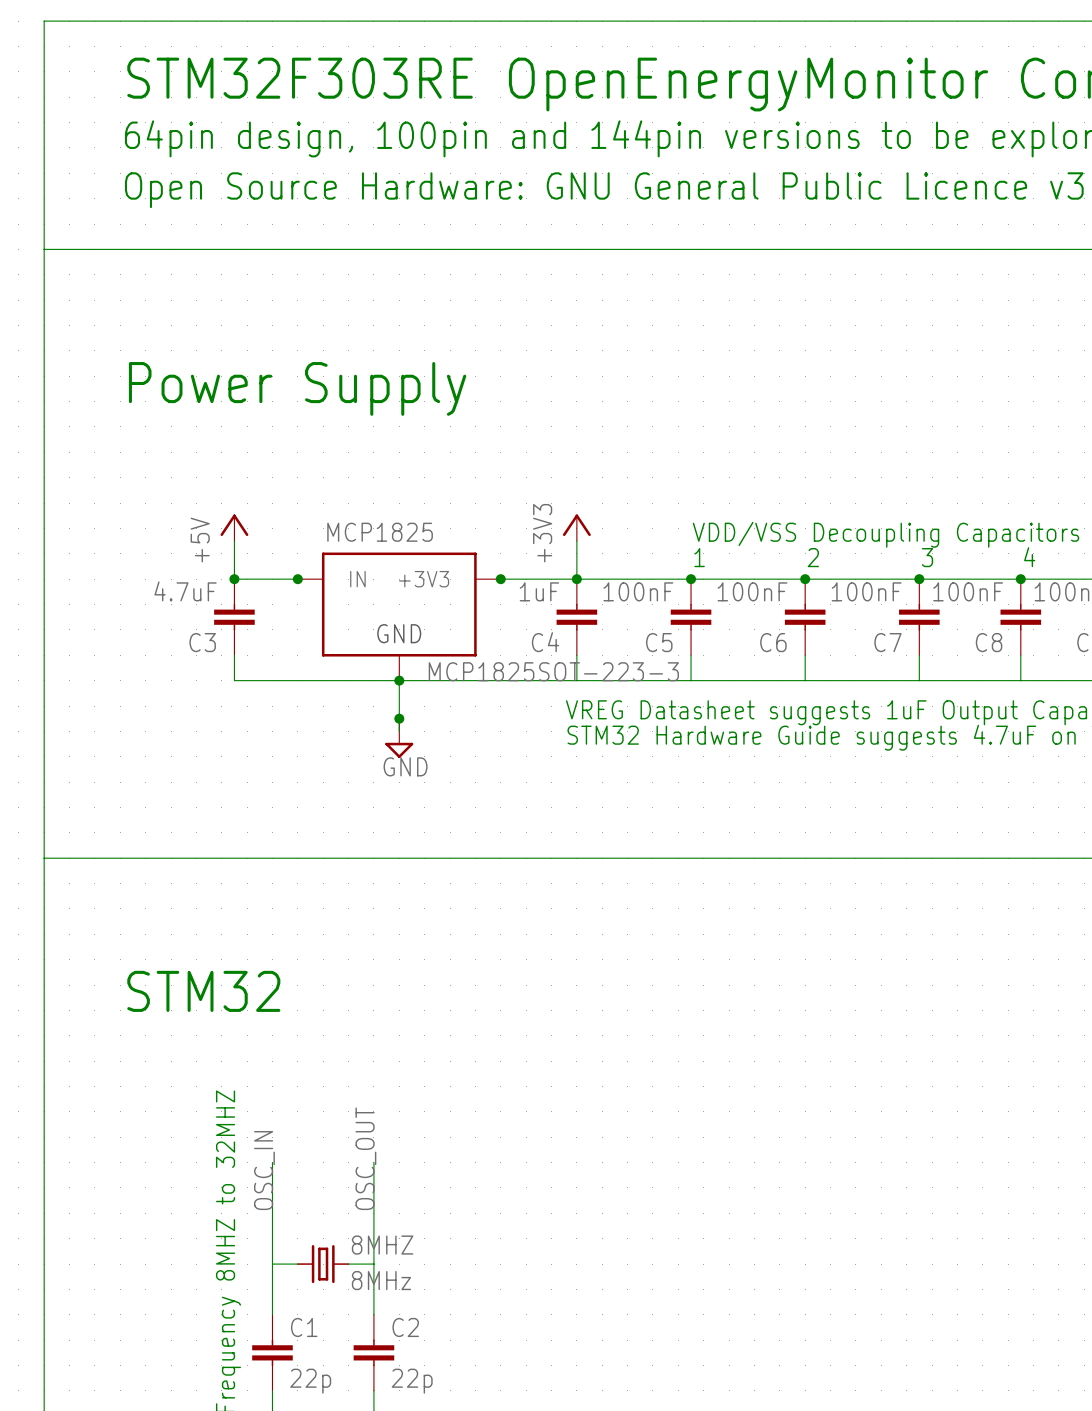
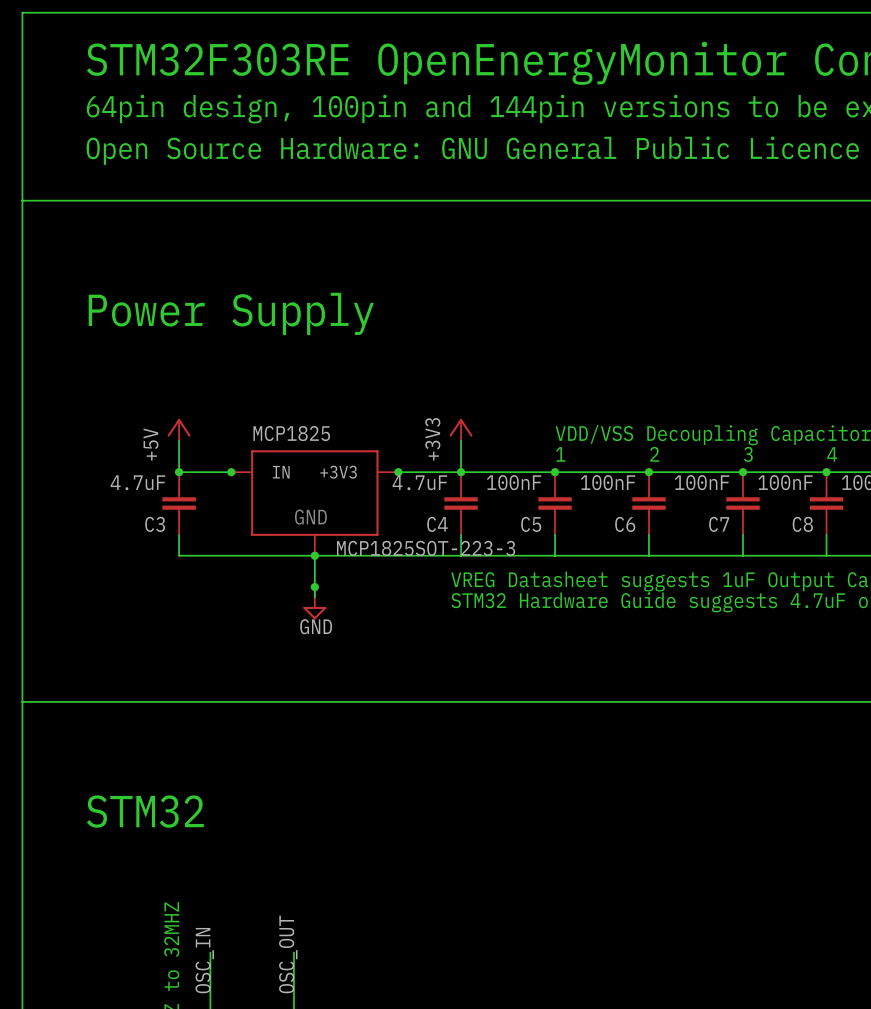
C4 value: 1uF (539, 591) -> 4.7uF (419, 482)

